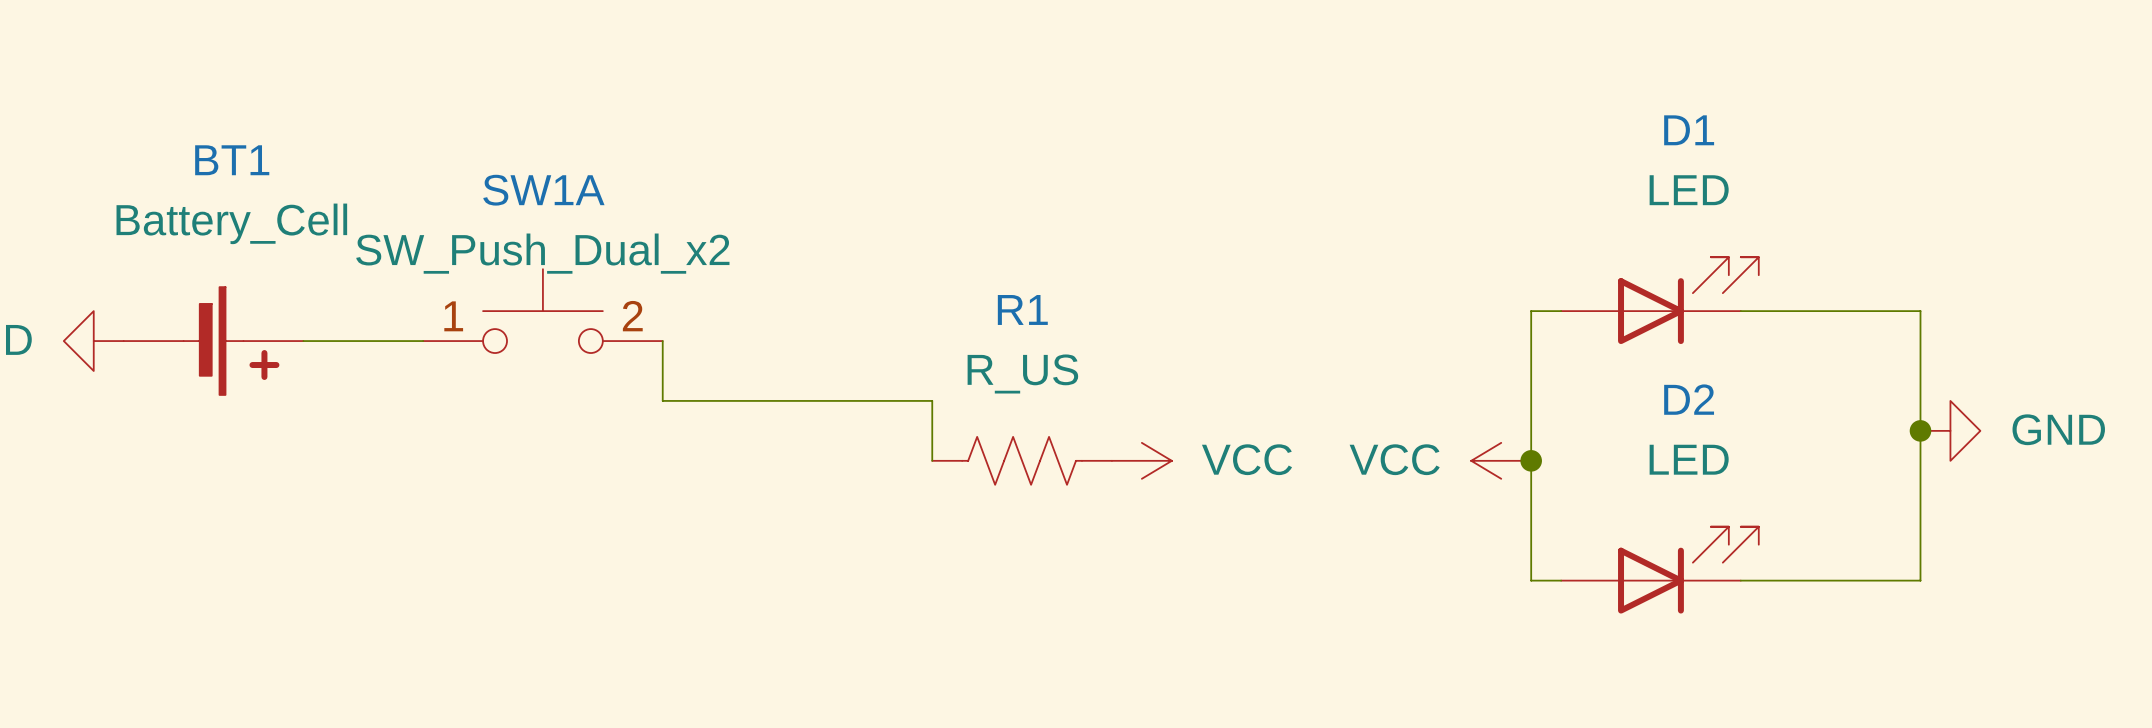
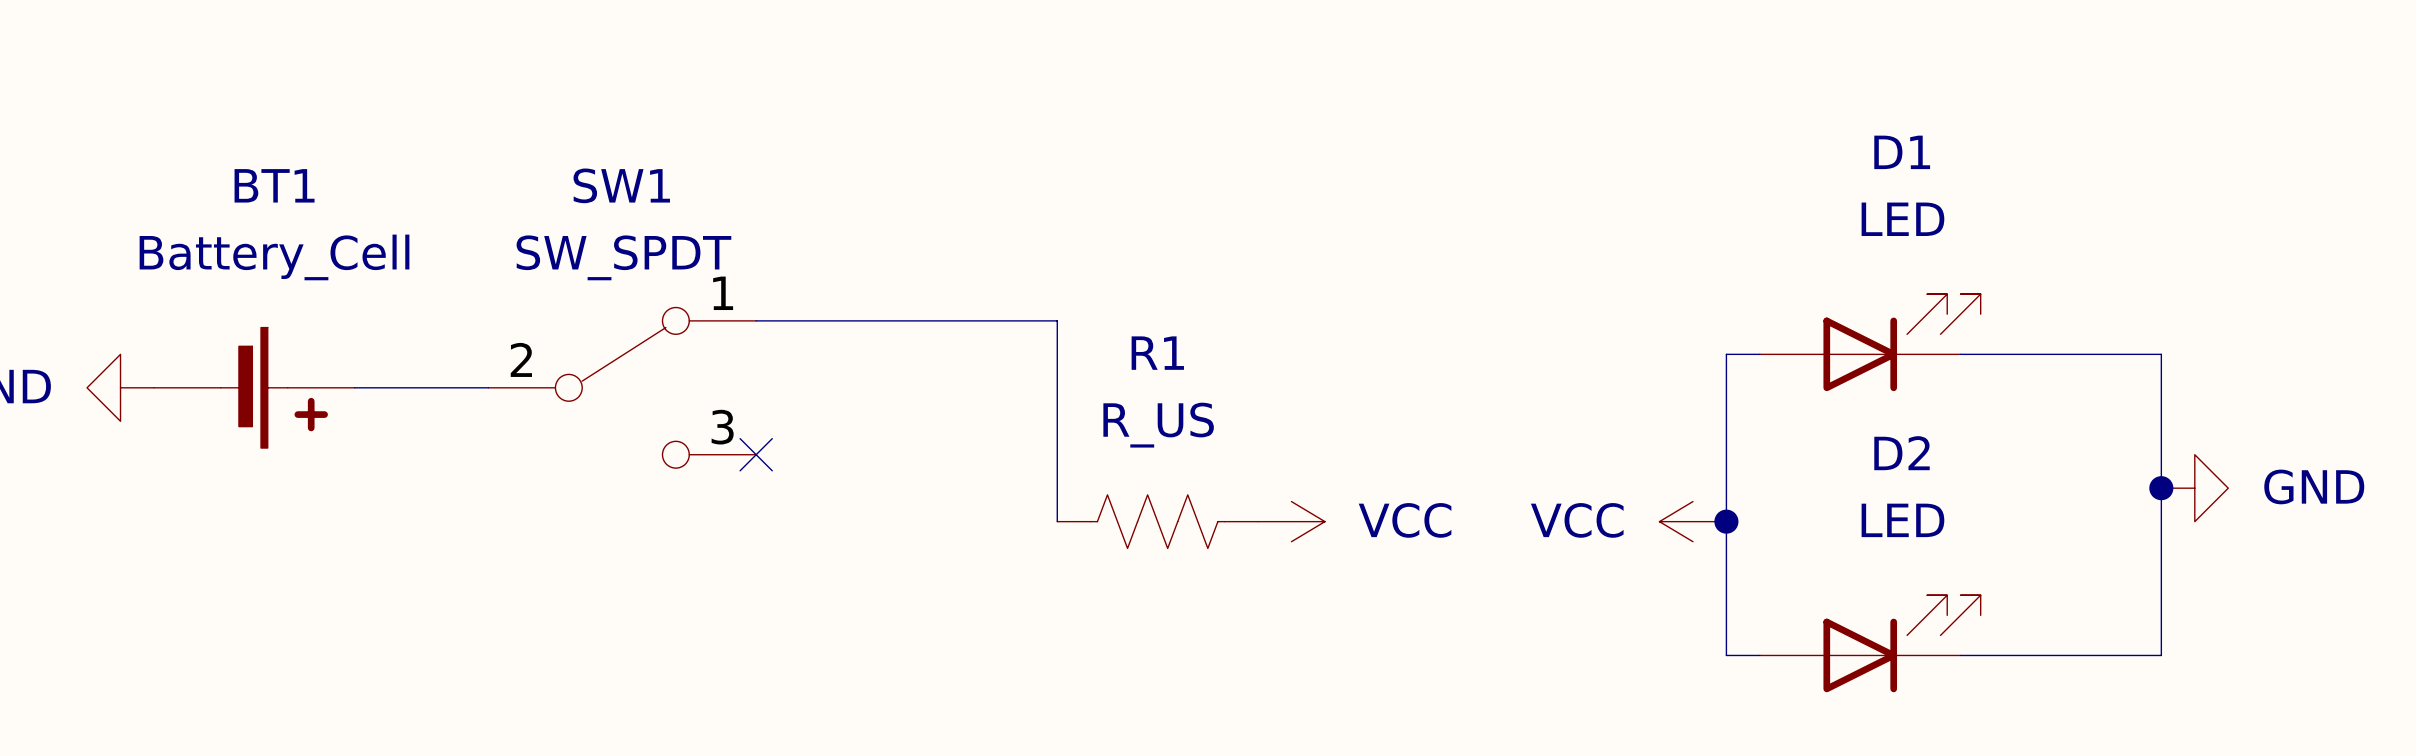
SW1A: SW_Push_Dual_x2 (542, 311) -> none
SW1: none -> SW_SPDT (622, 387)
wire: (662, 341) (662, 400) (932, 400) -> (756, 320) (1057, 320) (1057, 454)
no-connect mark: none -> (756, 454)

